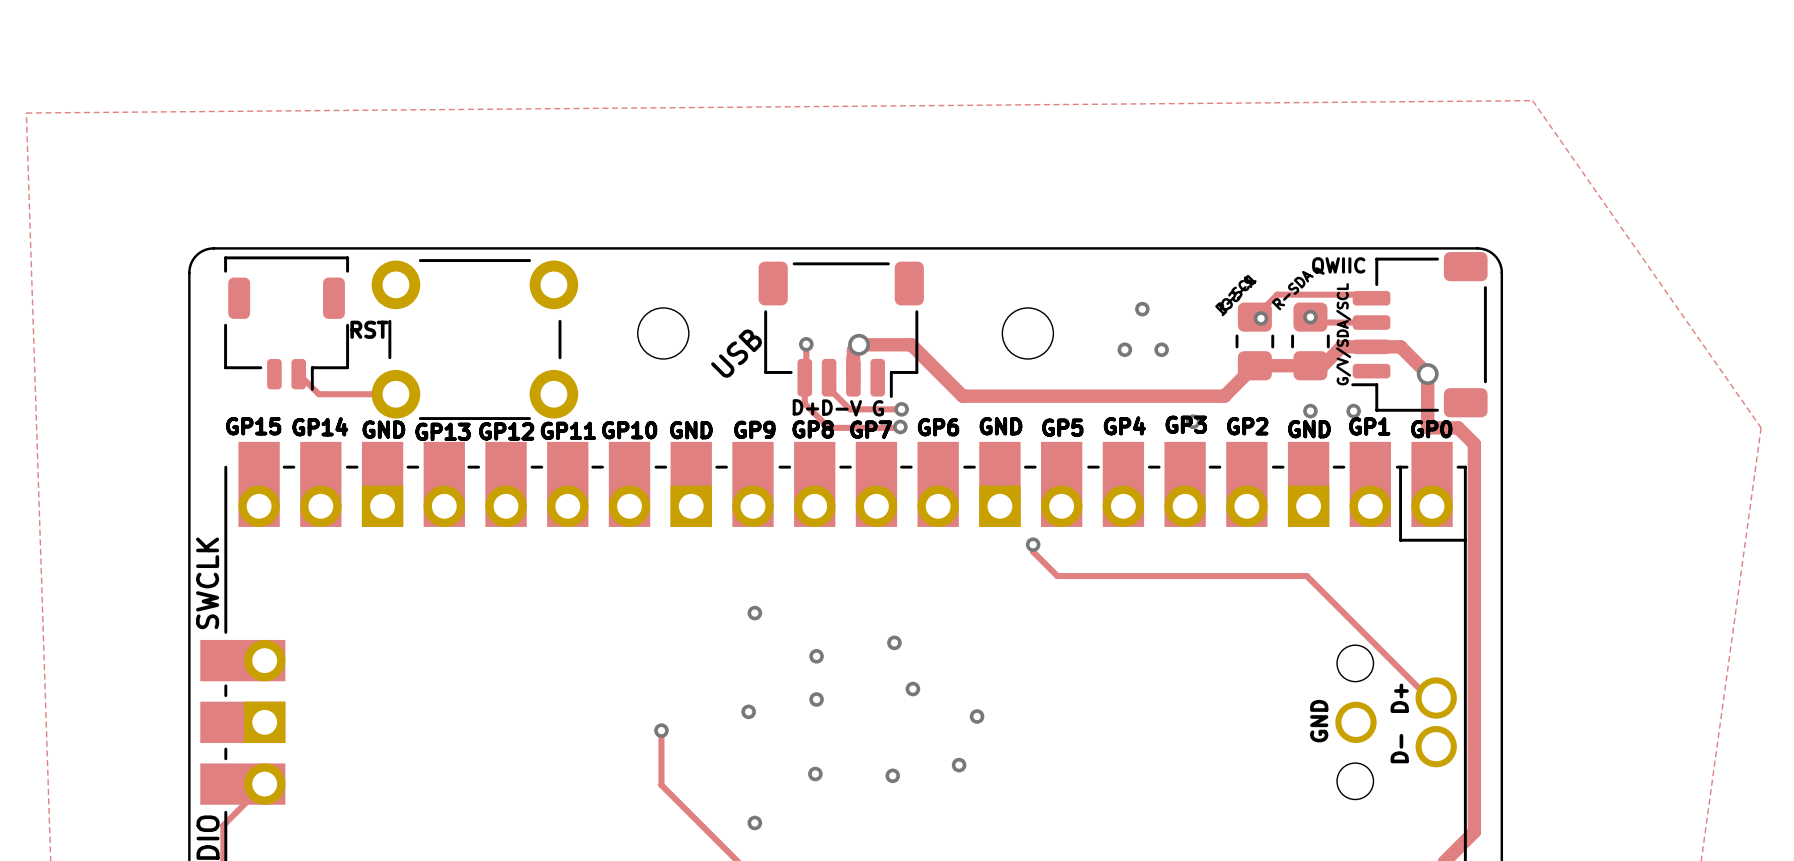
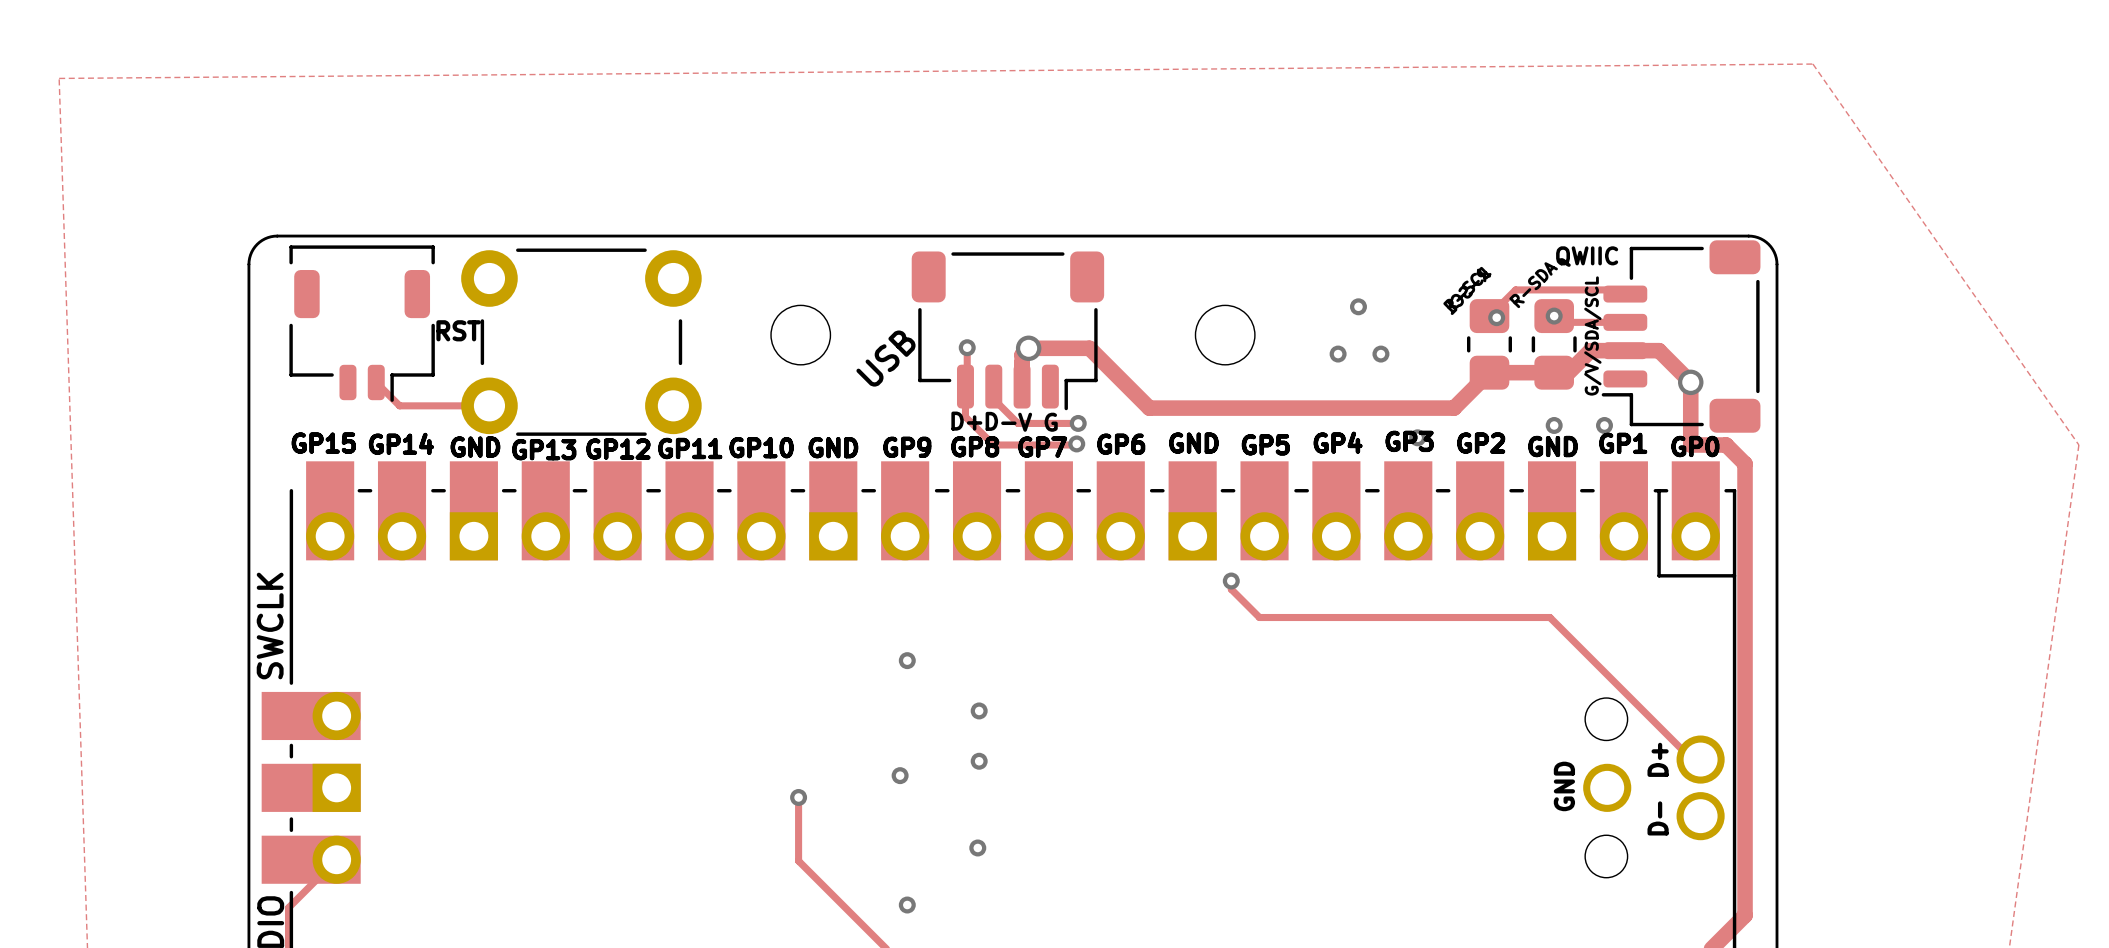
via: (894, 642) -> none
via: (912, 689) -> none
via: (977, 716) -> none
via: (959, 765) -> none
via: (892, 775) -> none

